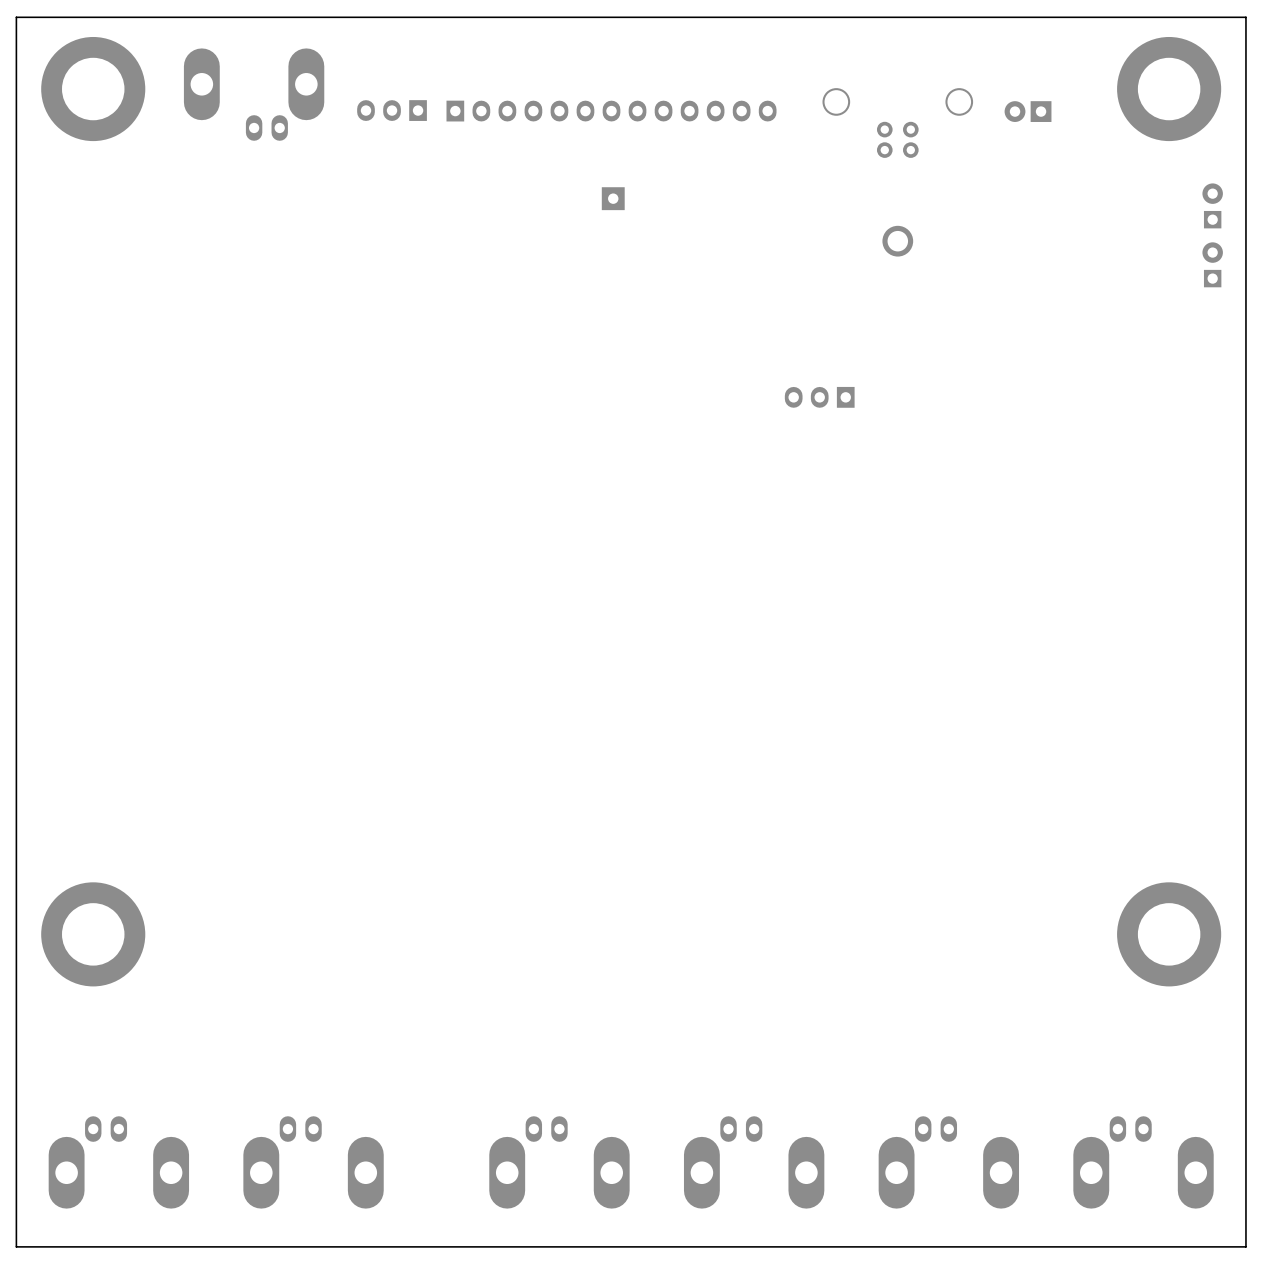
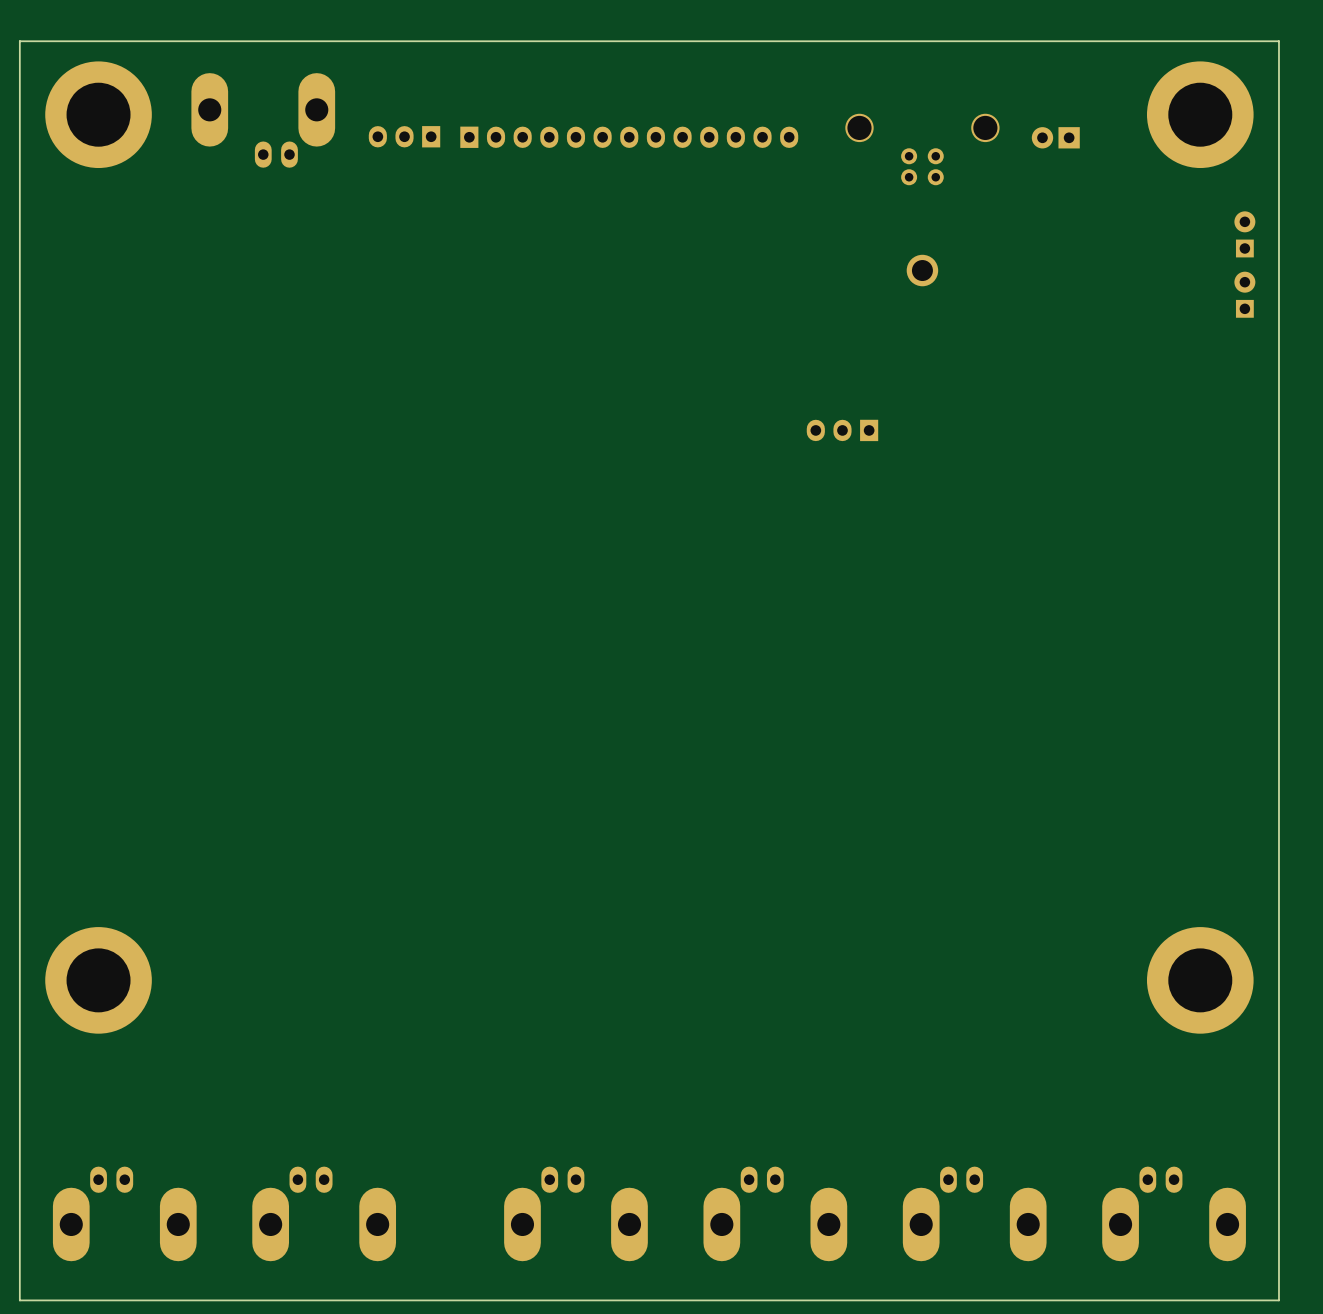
part: (613, 198) -> none

